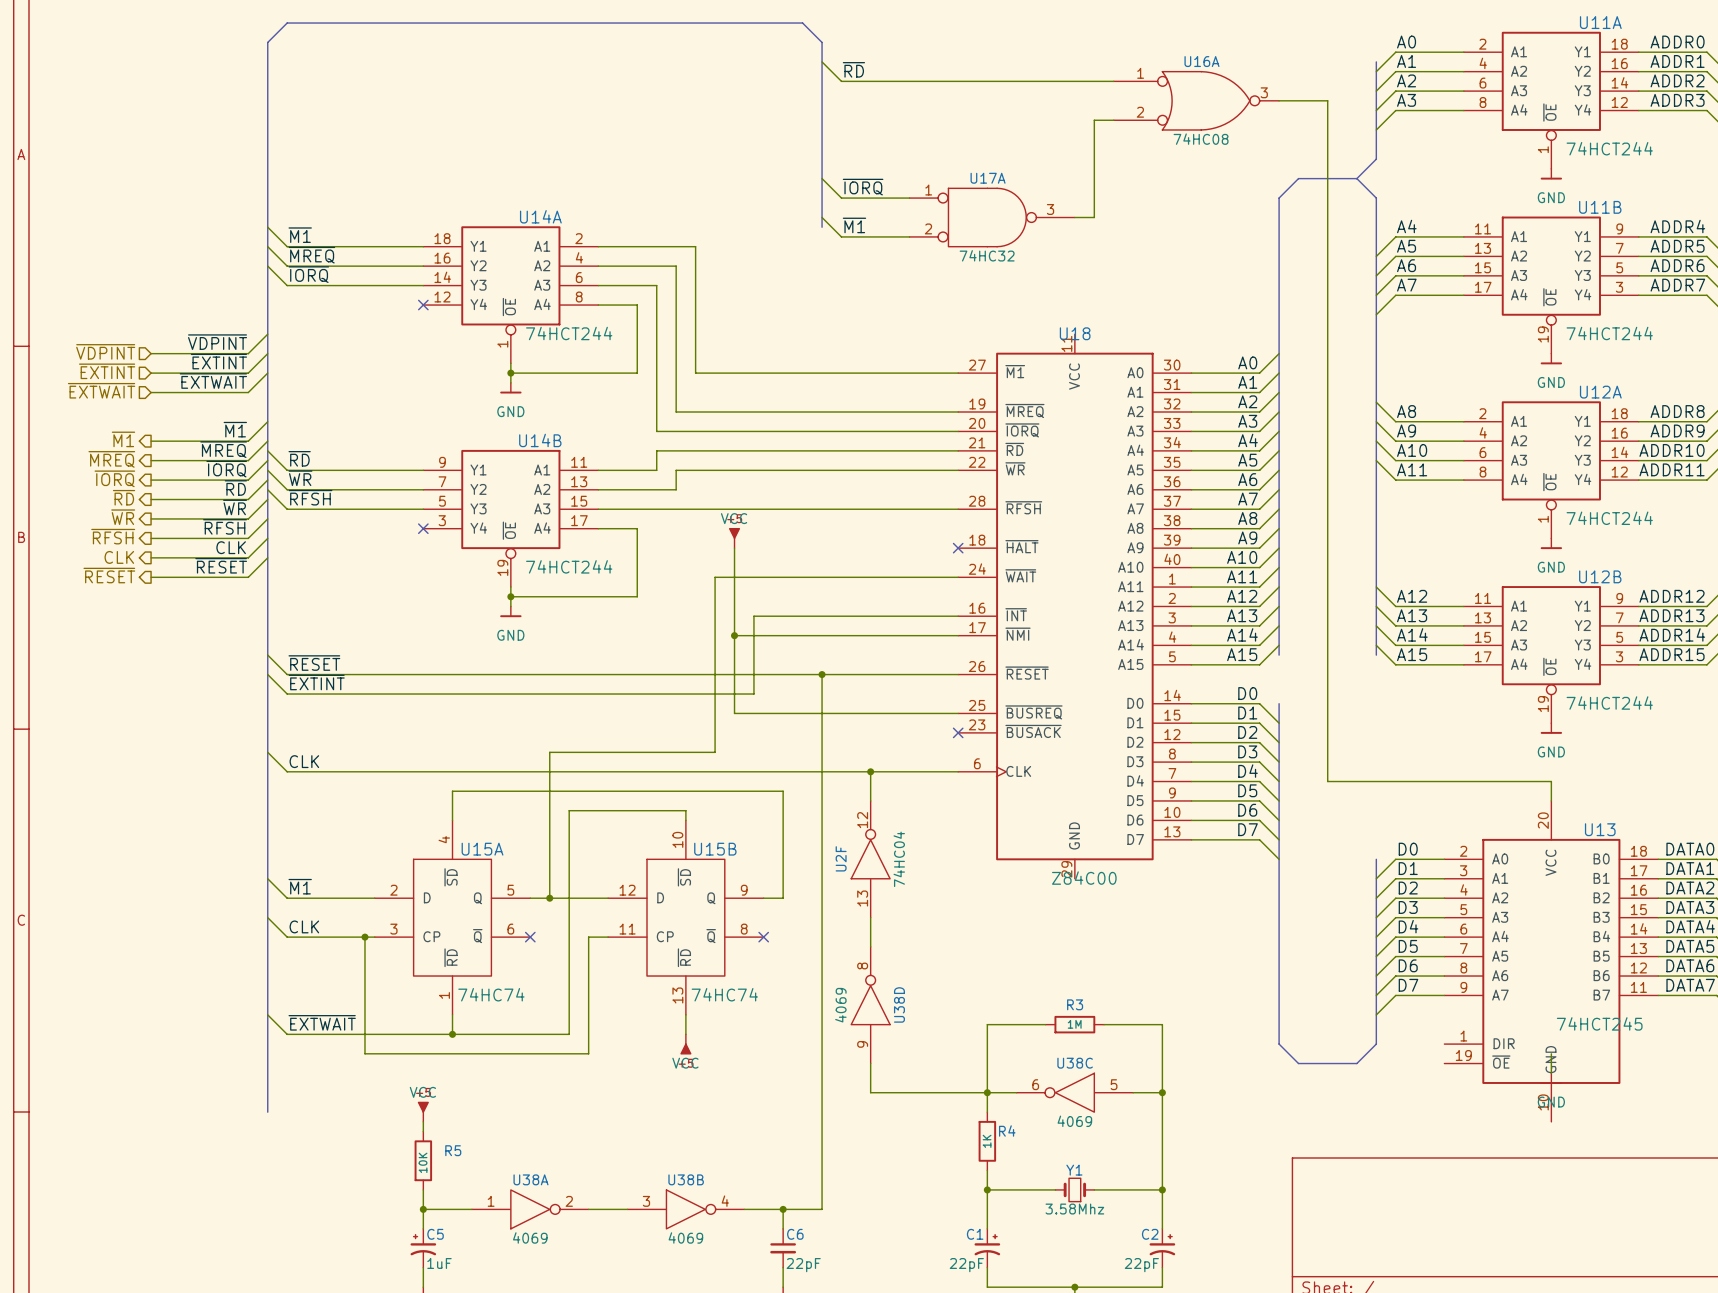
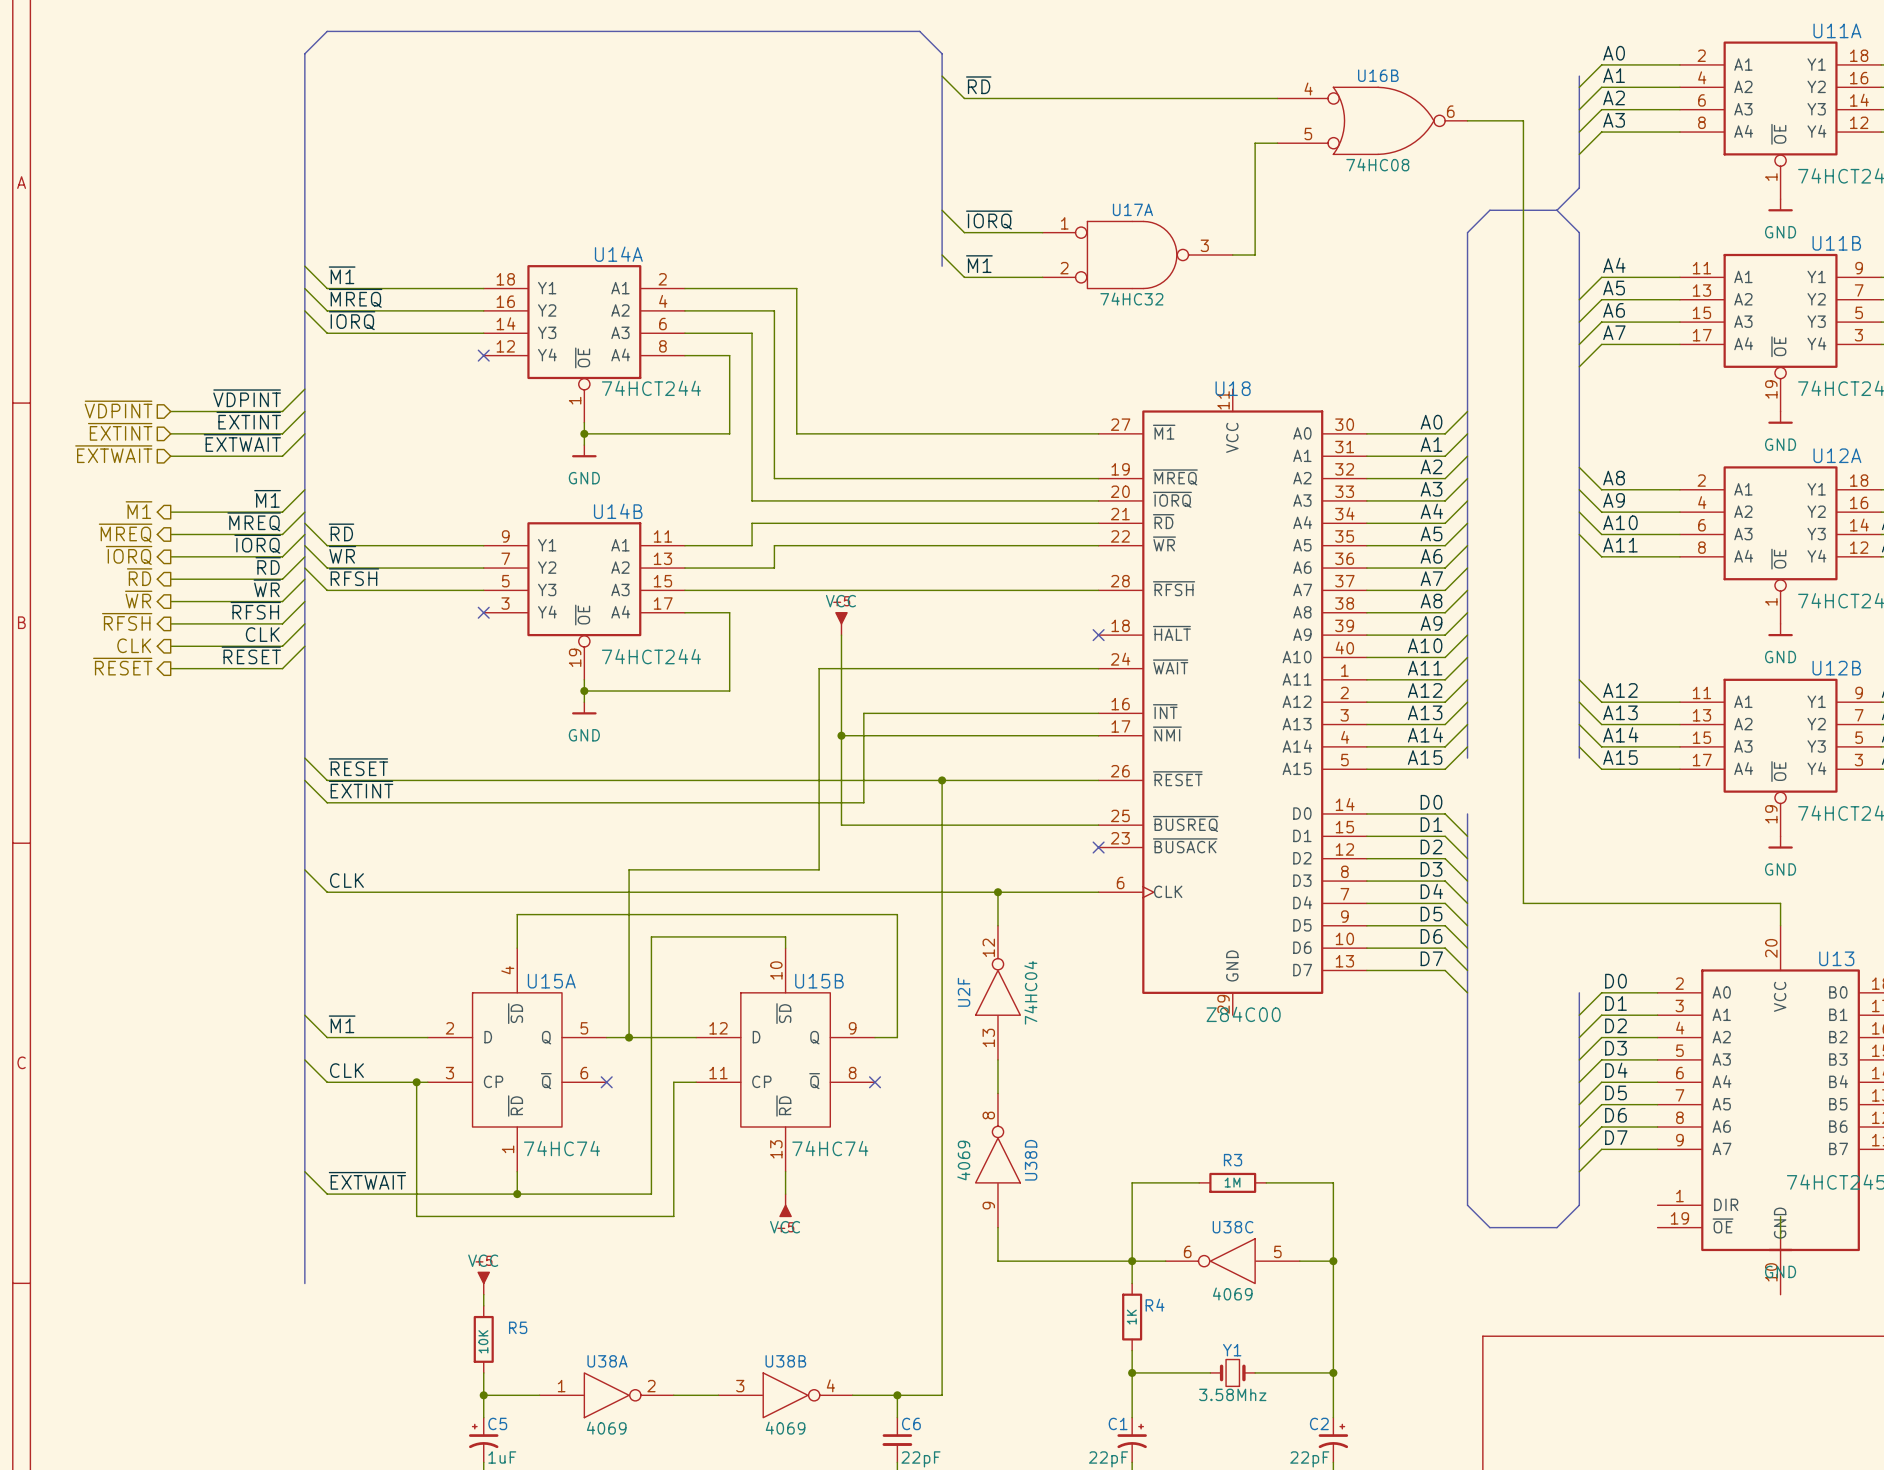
U16A name: U16A (1201, 61) -> U16B (1378, 75)
U16A pin number: 1 (1140, 73) -> 4 (1308, 89)
U16A pin number: 3 (1264, 92) -> 6 (1450, 111)
U16A pin number: 2 (1140, 112) -> 5 (1308, 133)

